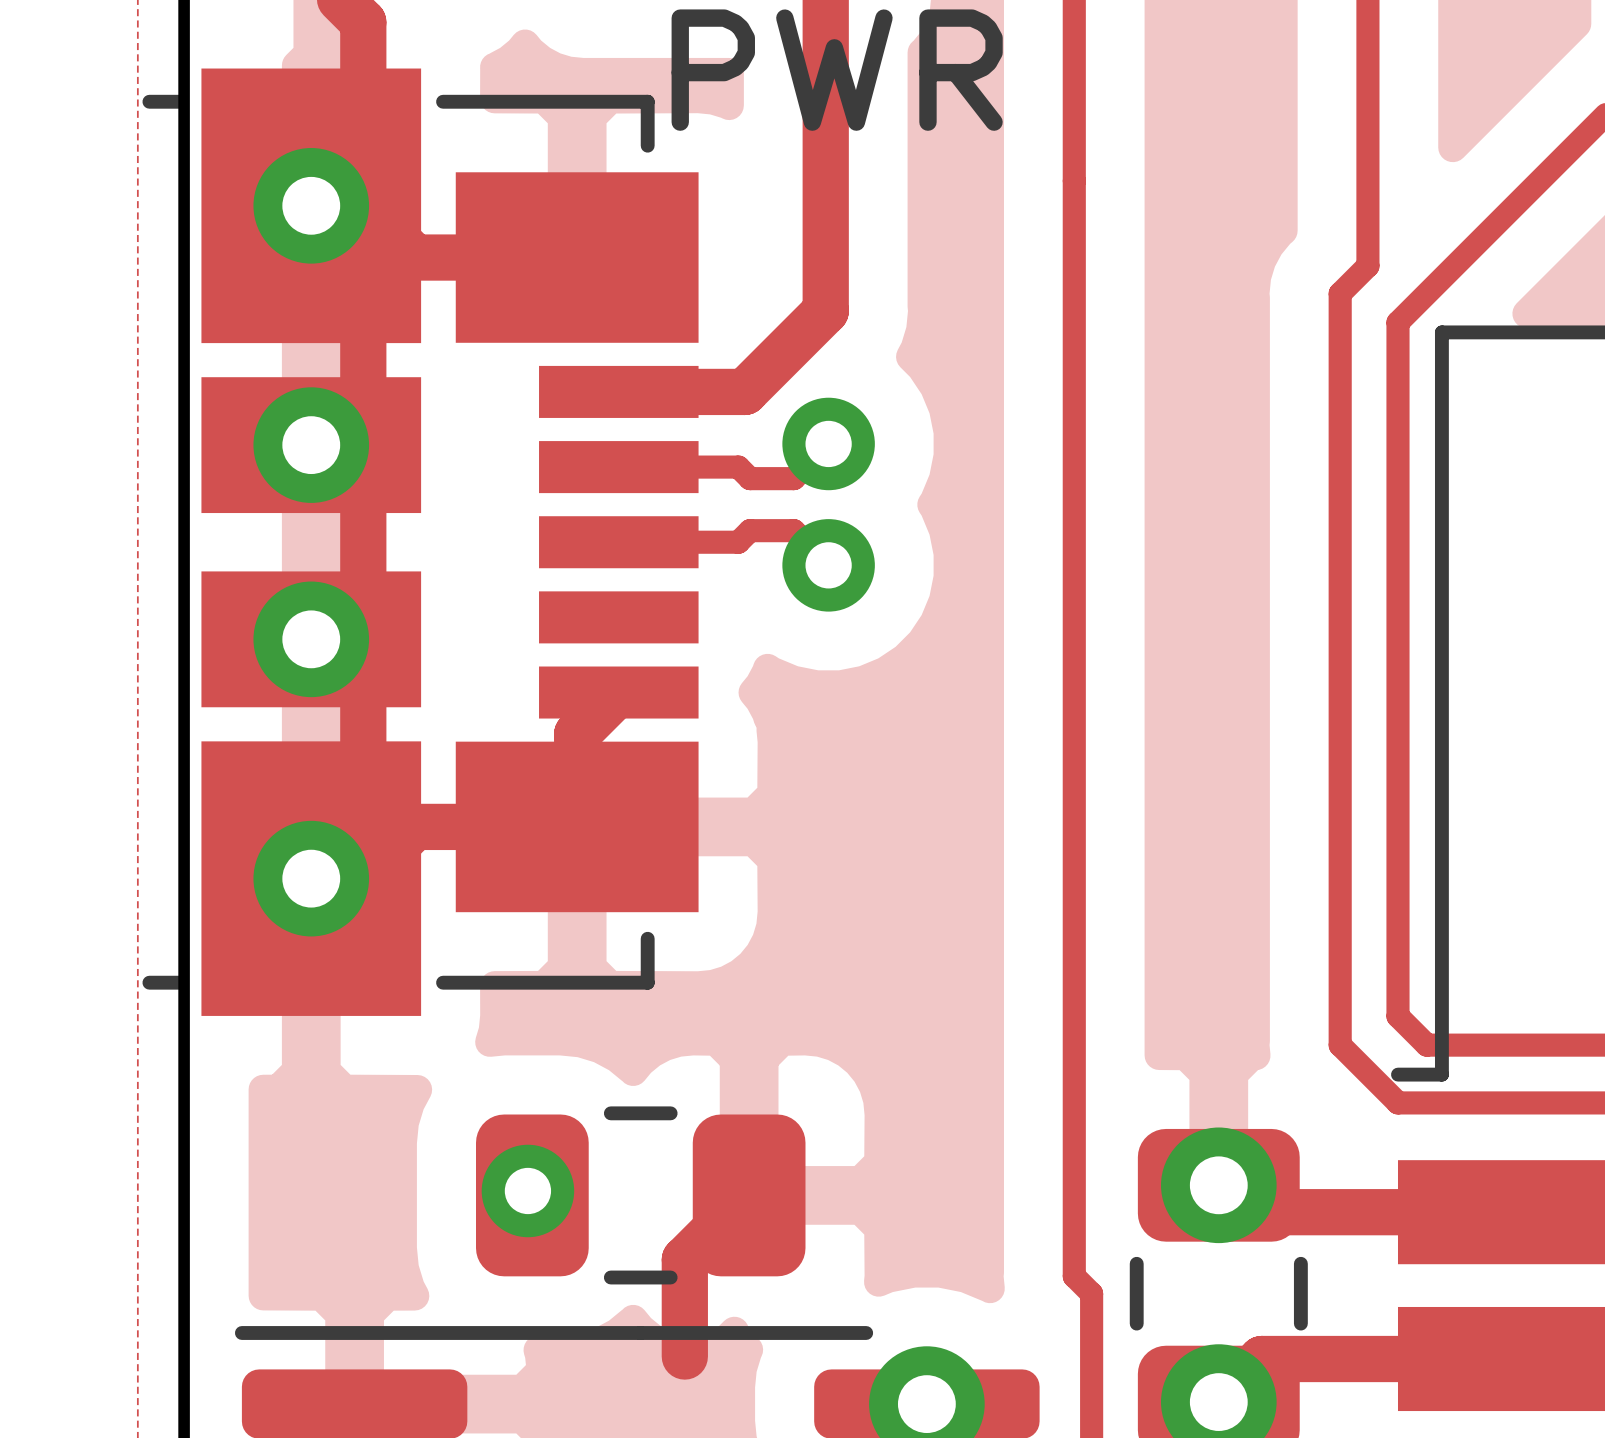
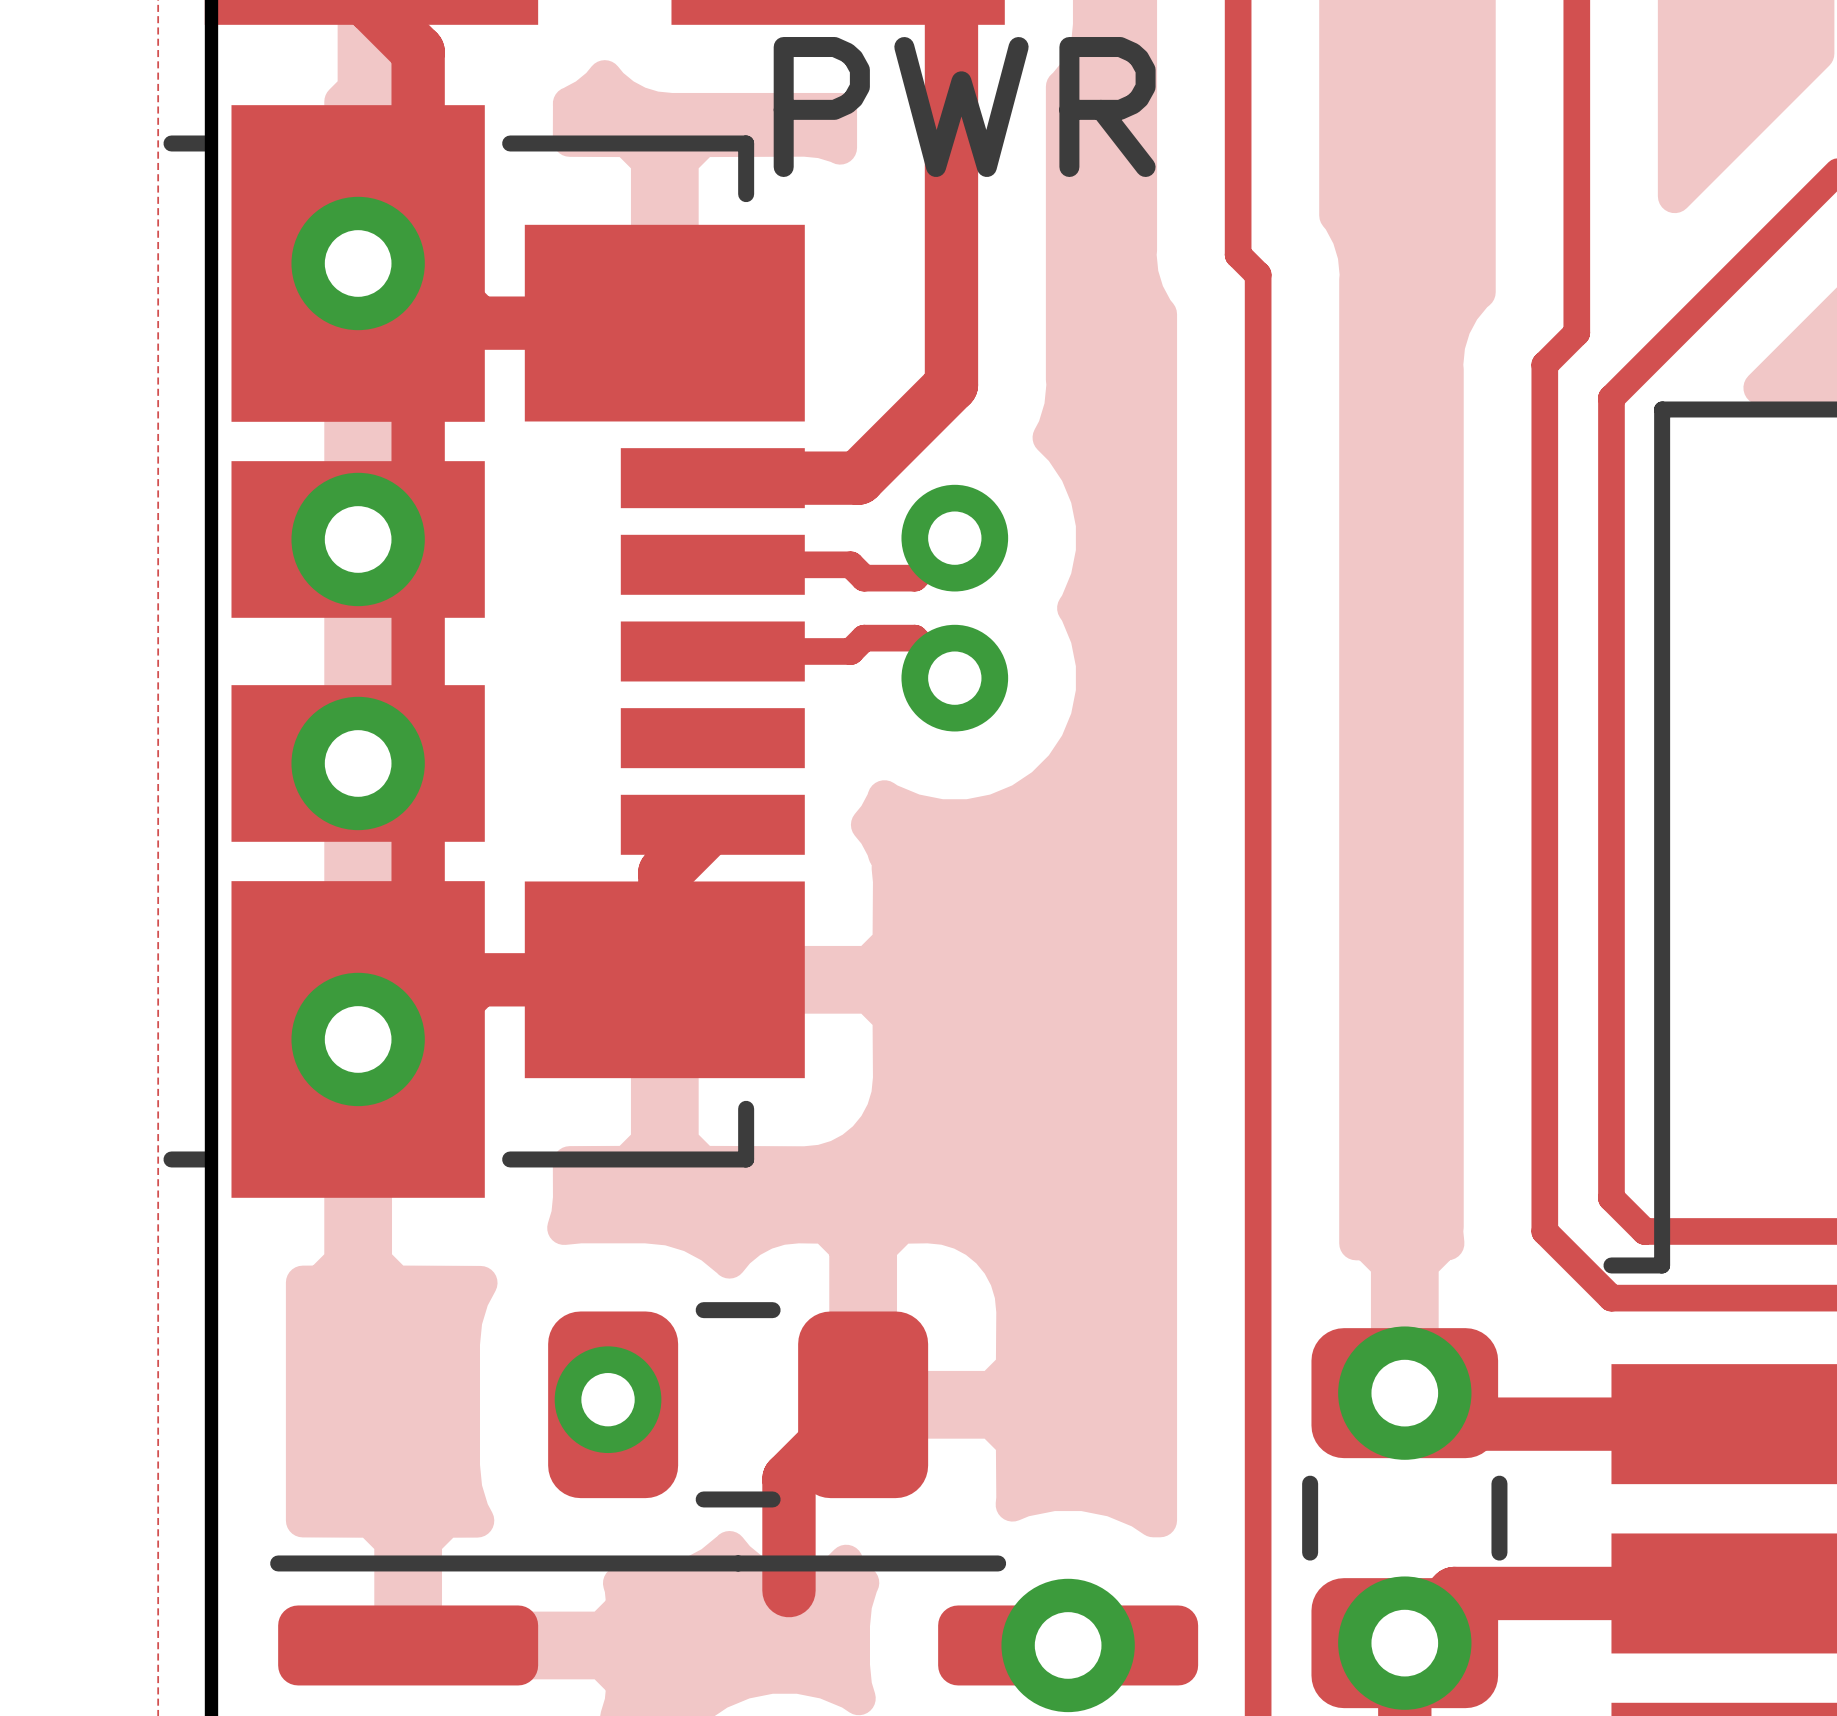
track: (1074, 198) (1074, 1276) (1091, 1293) -> (1238, 254) (1258, 274) (1258, 1518)

